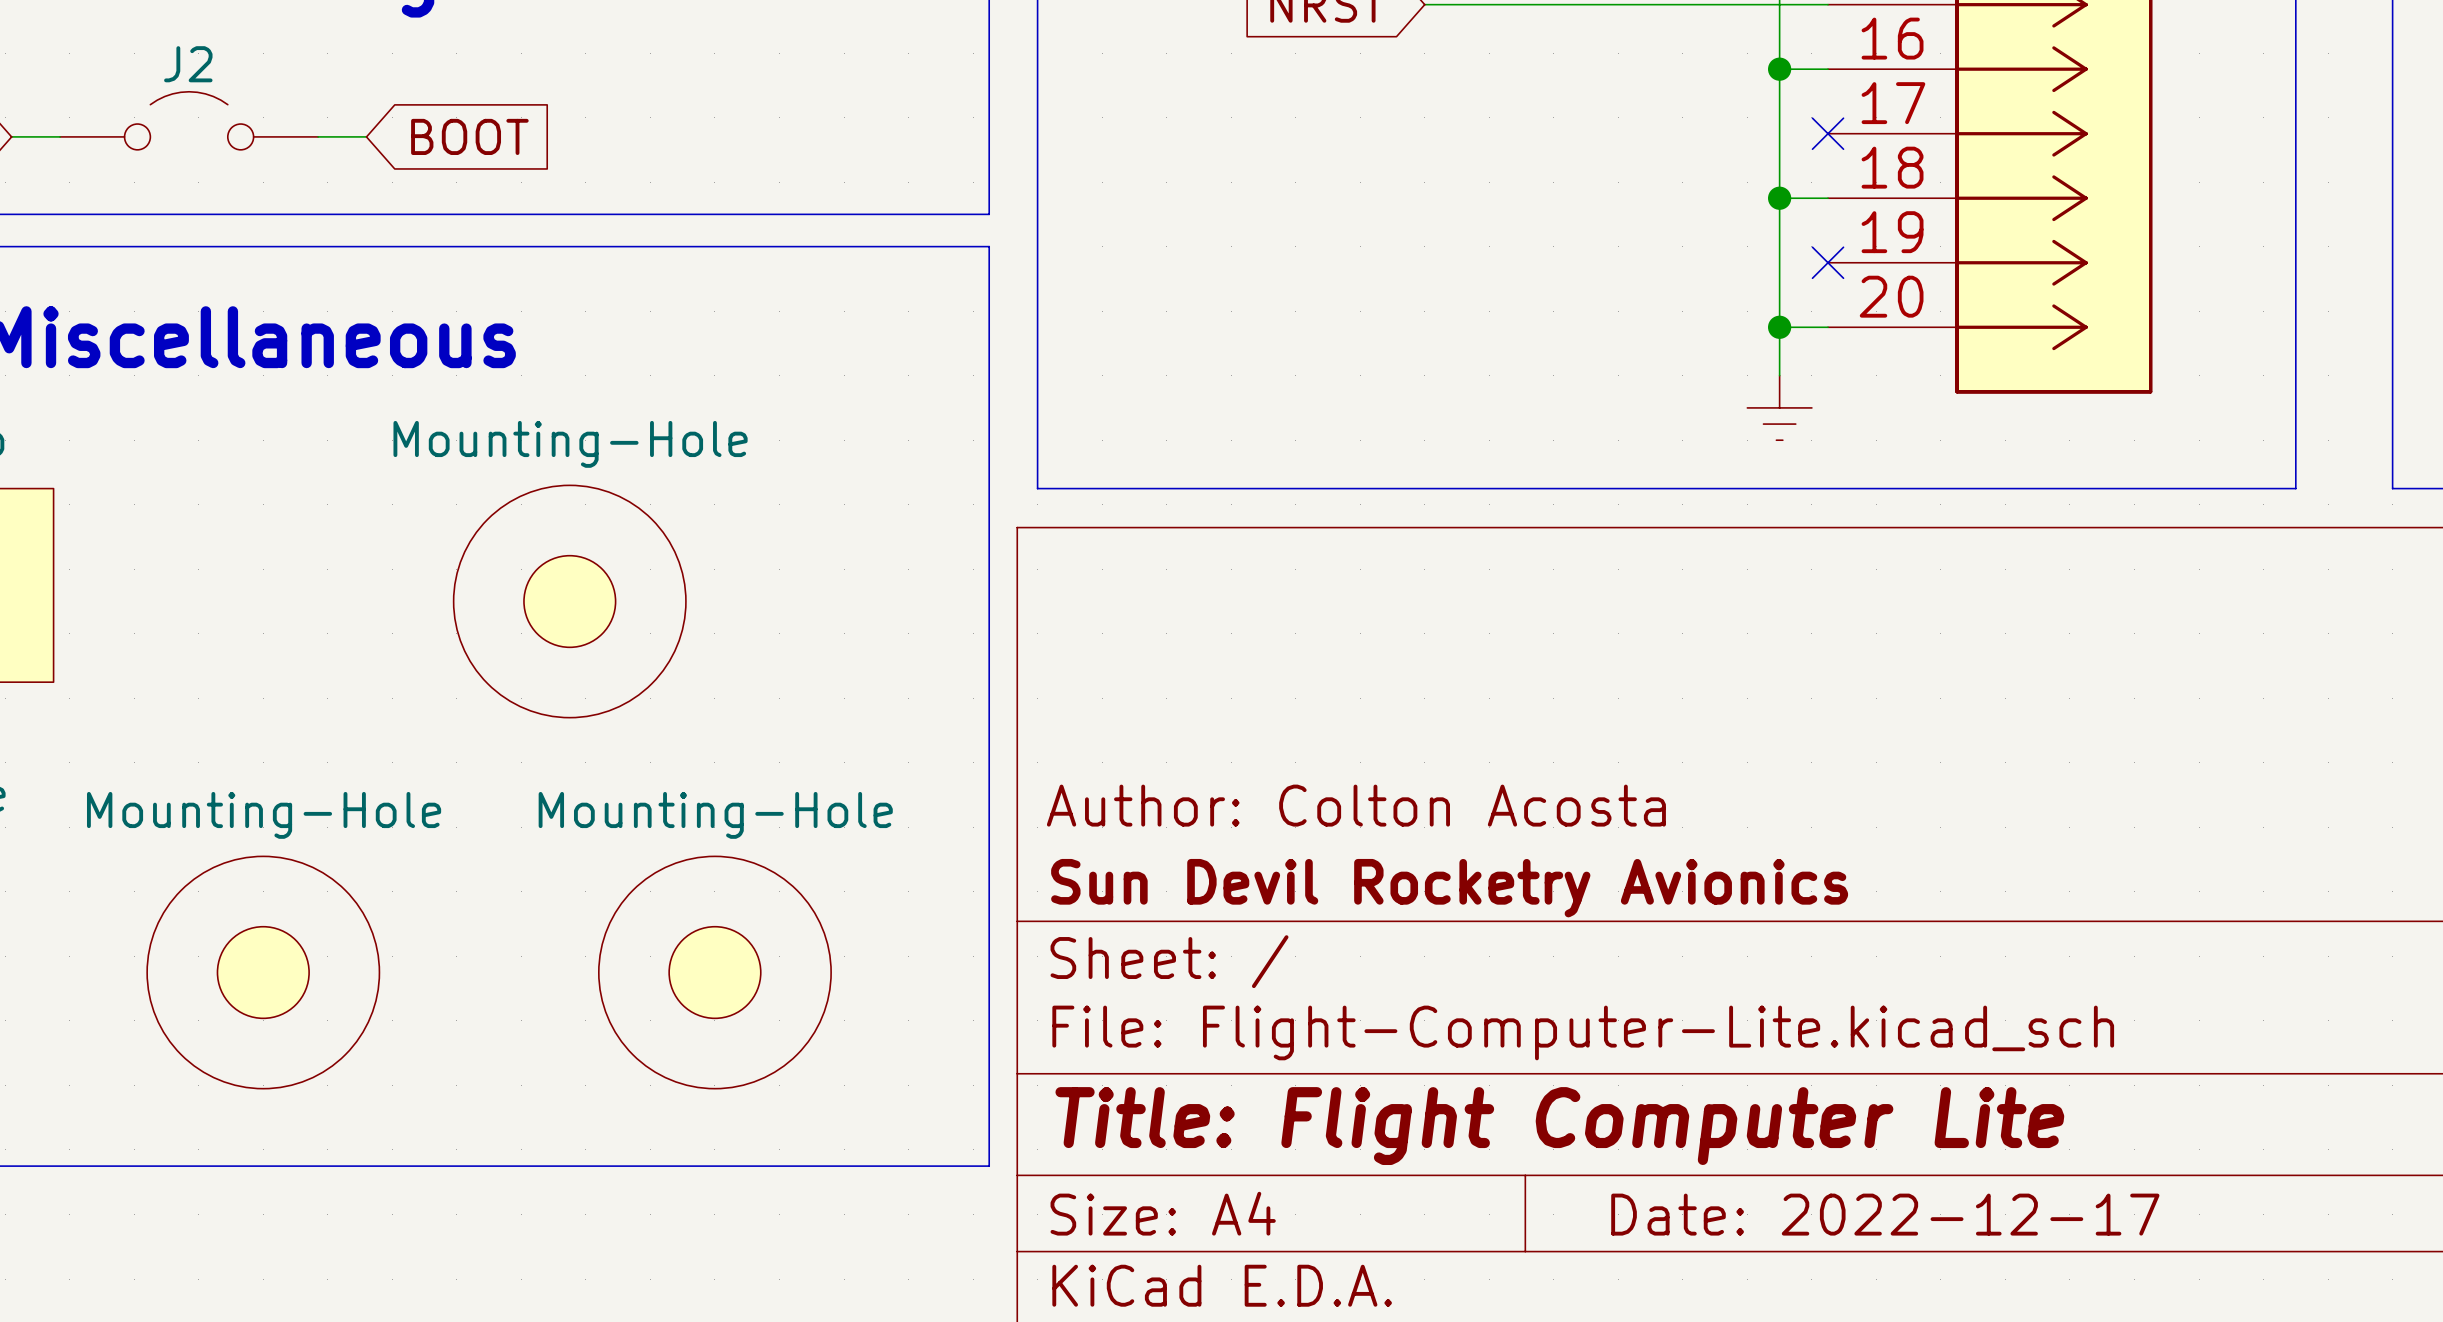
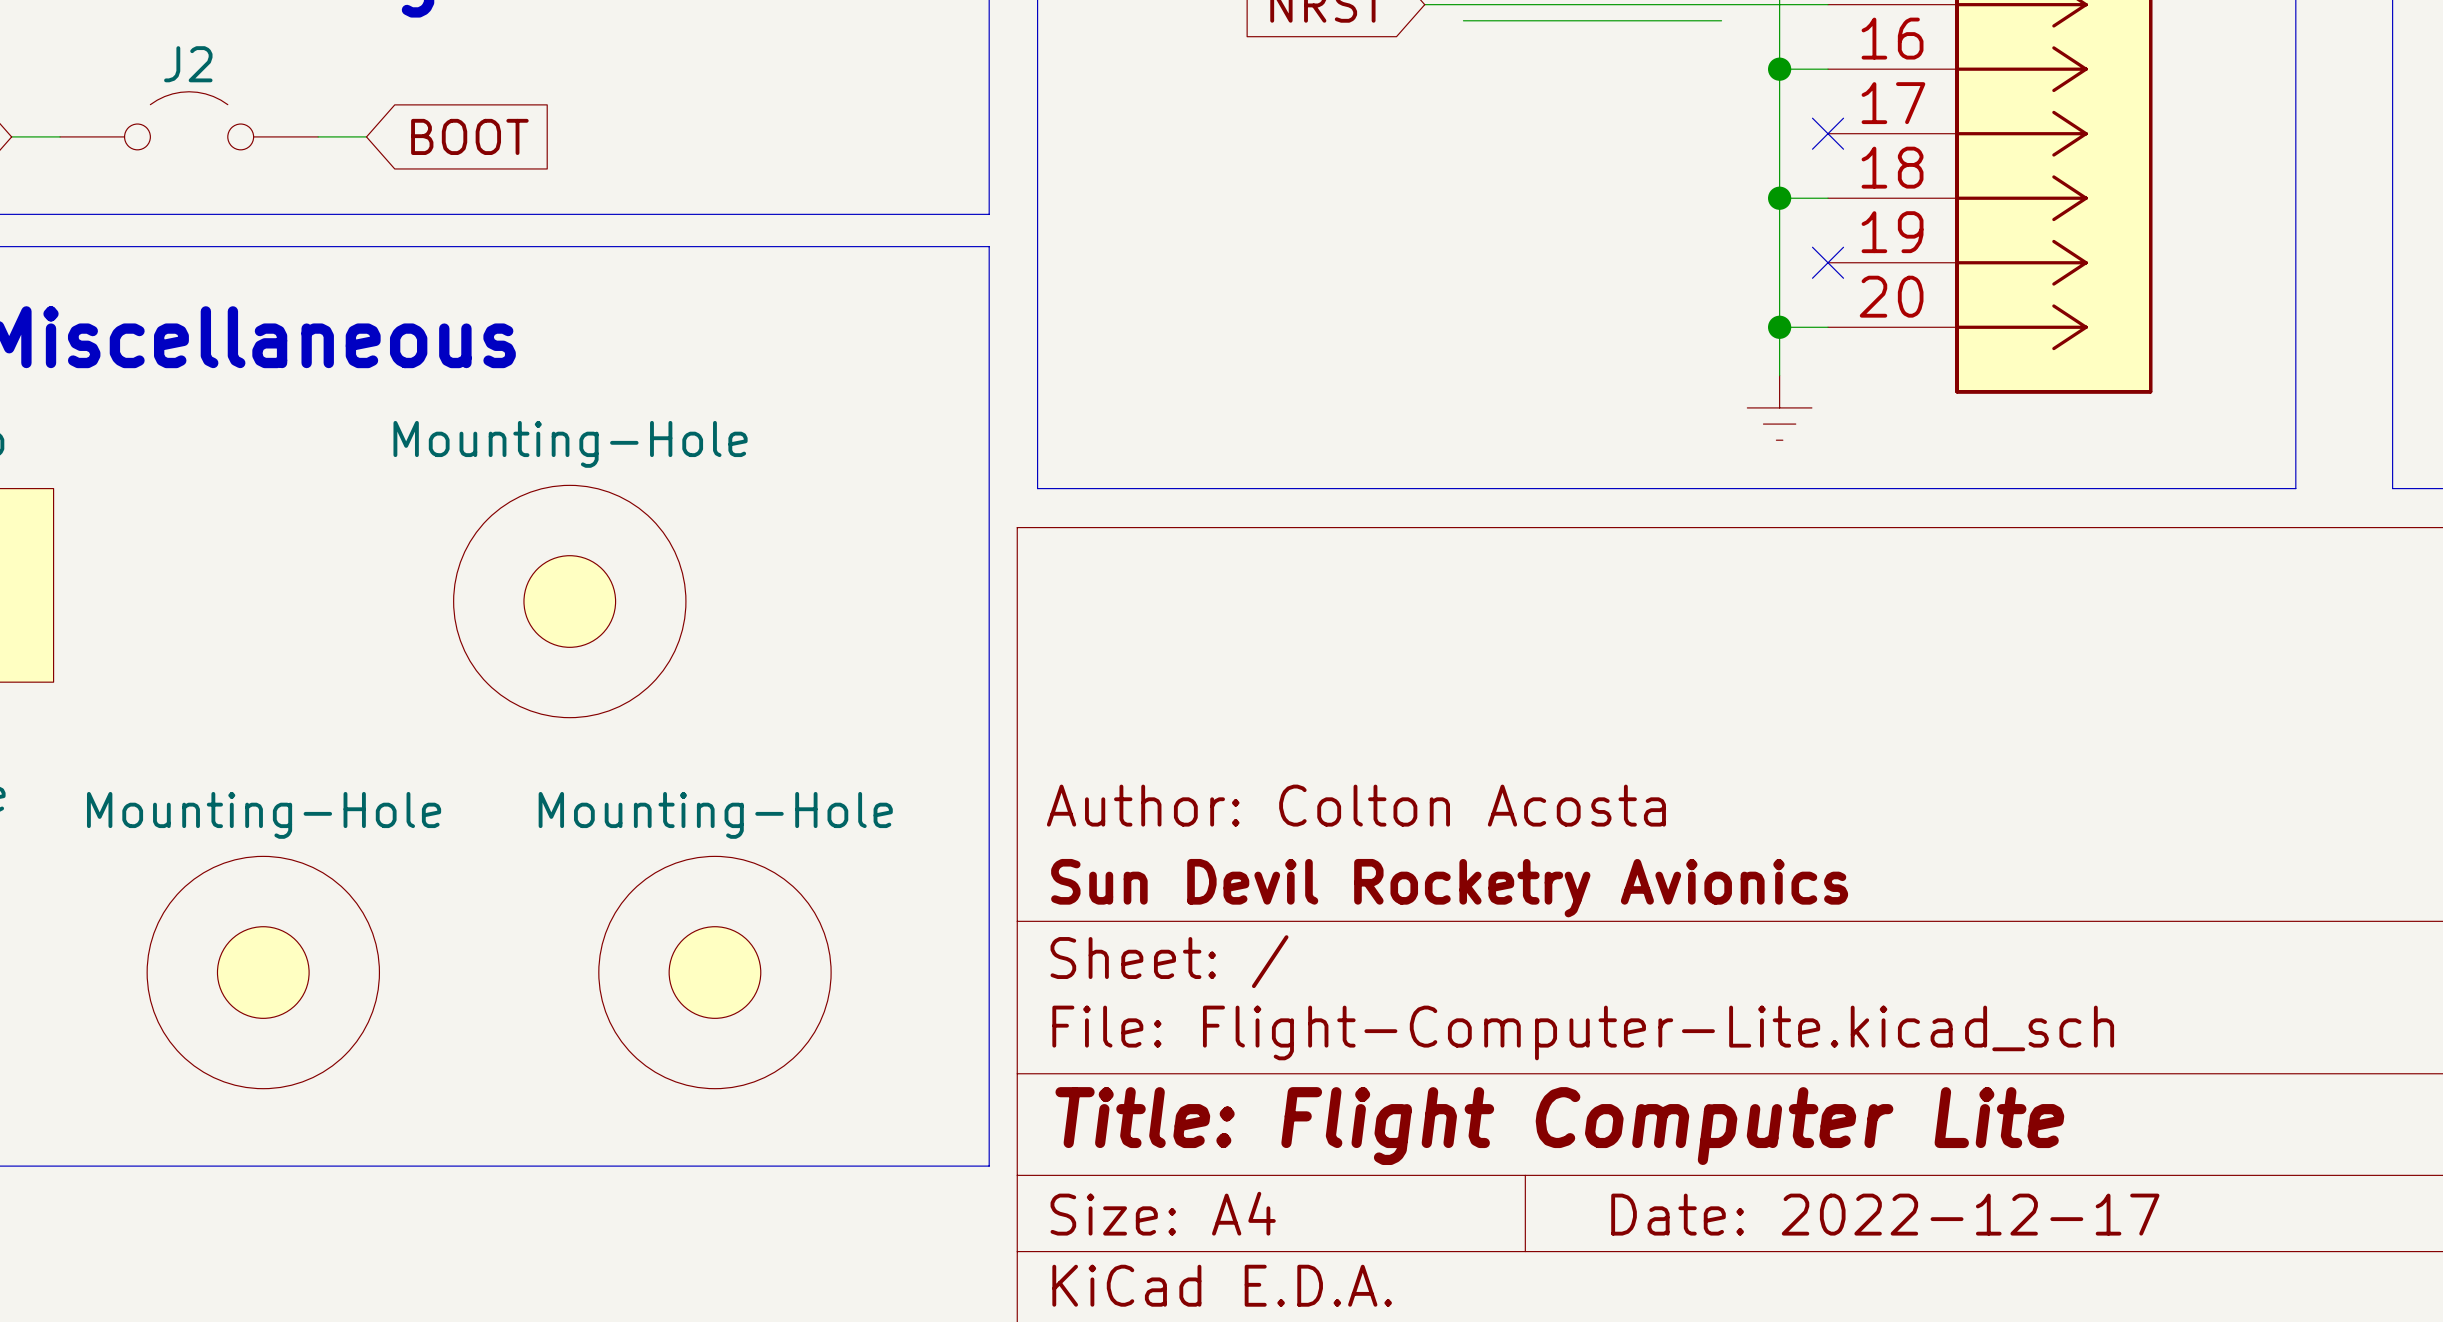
wire: none -> (1463, 20) (1721, 20)

